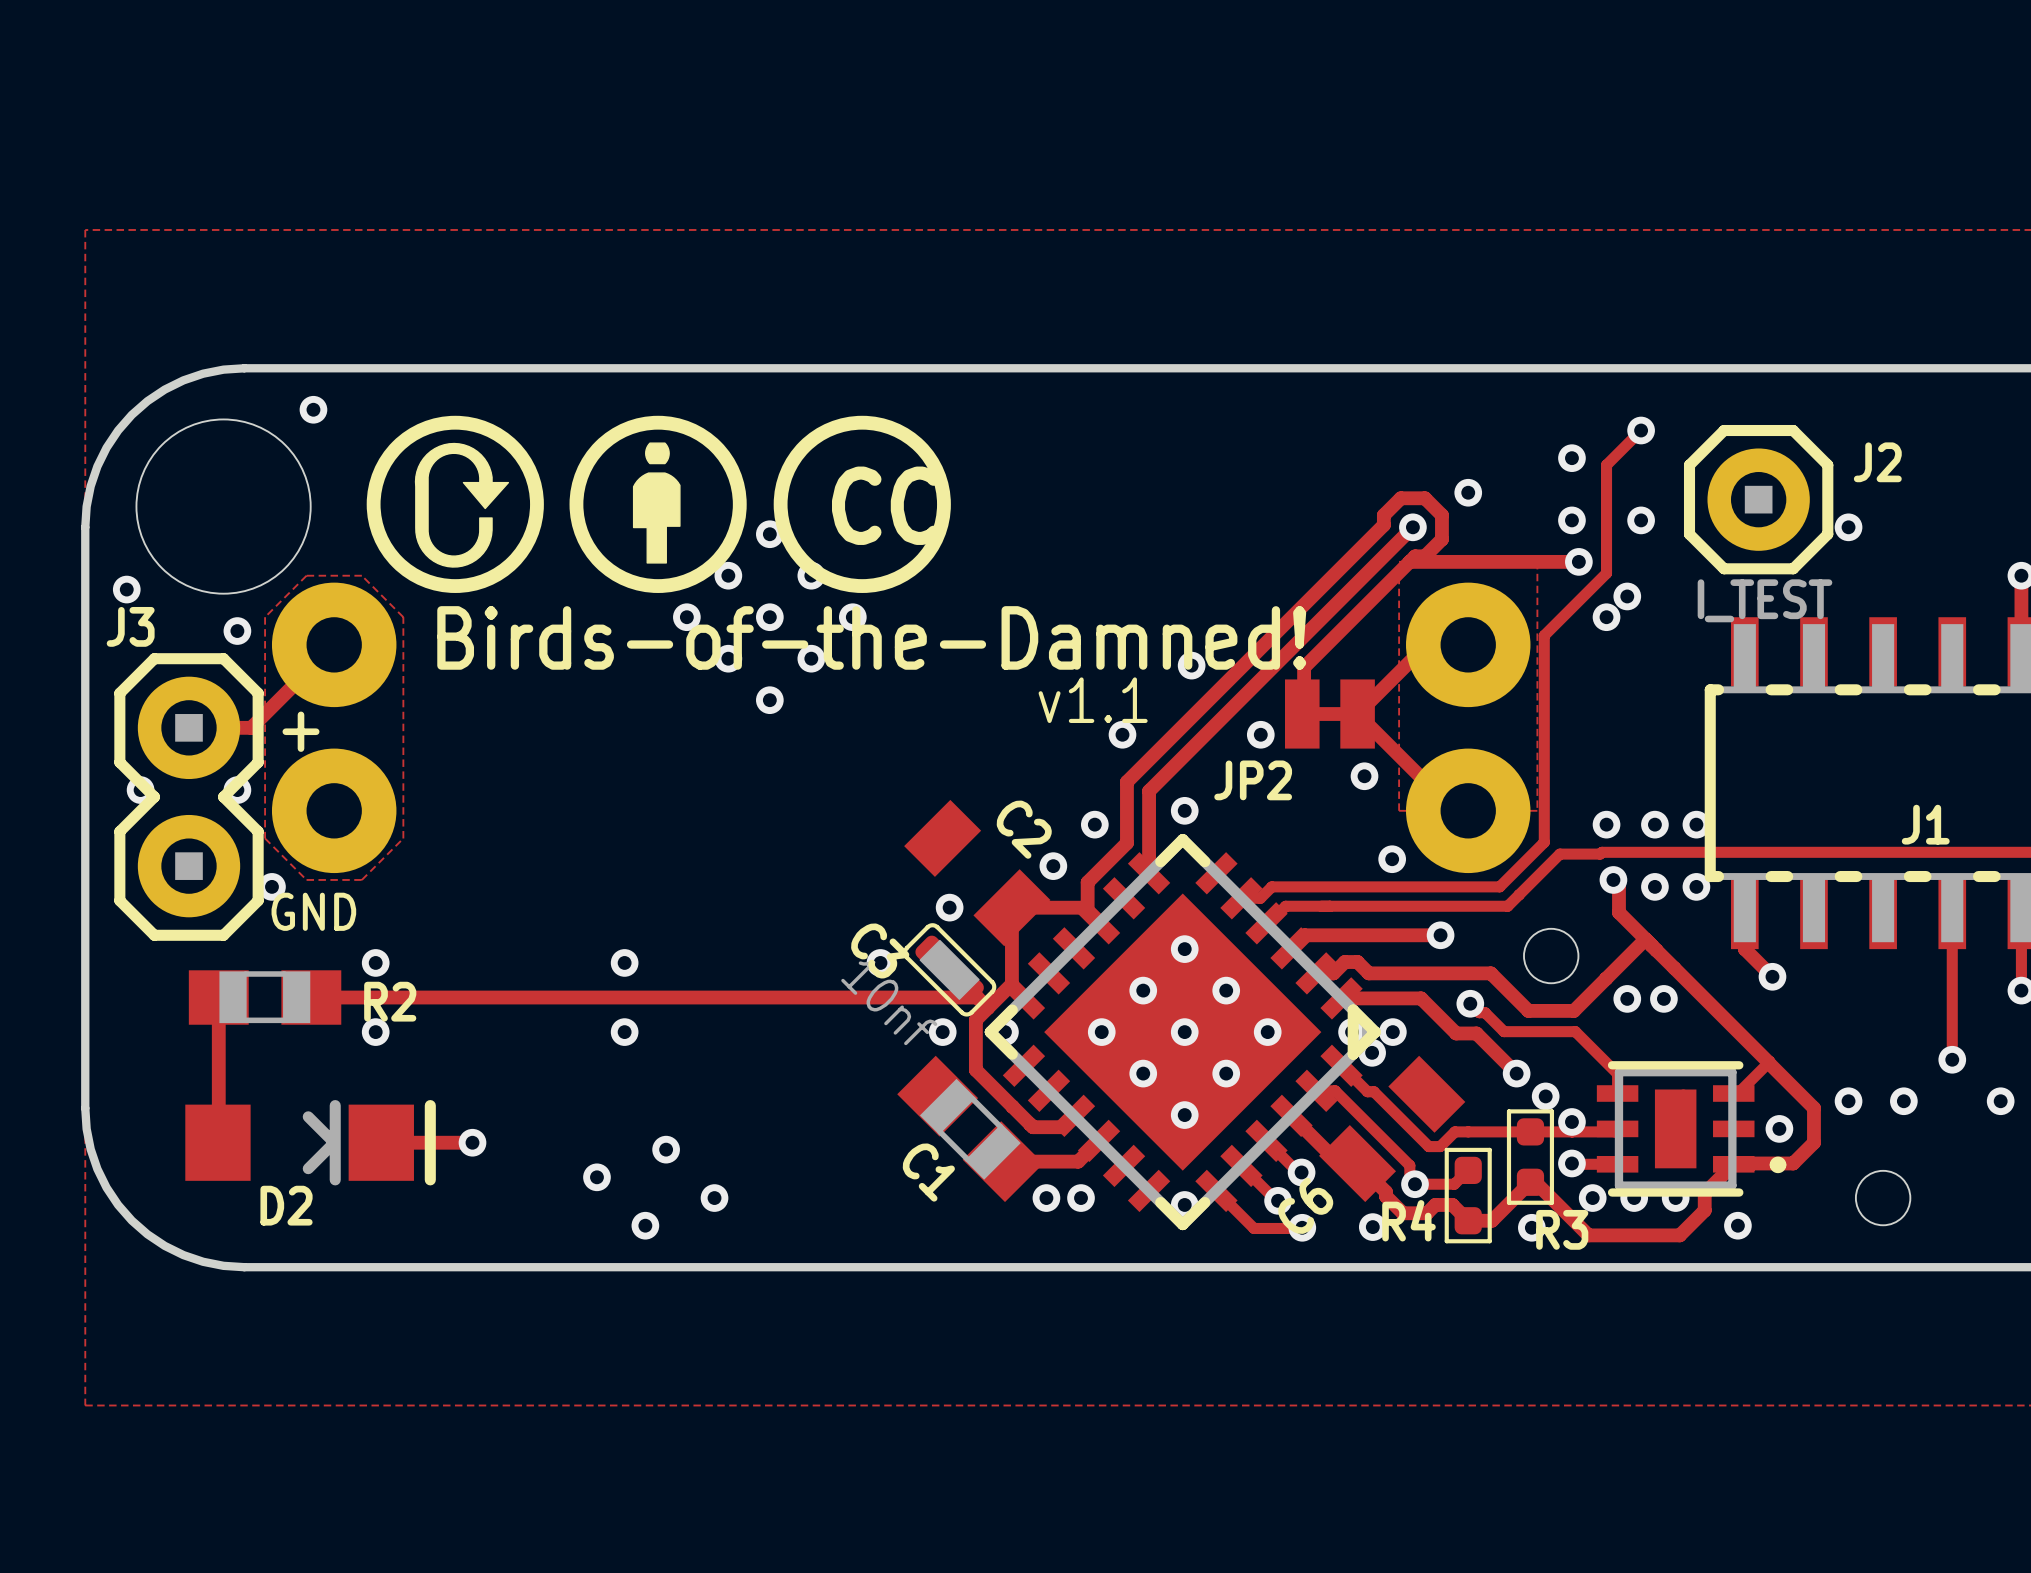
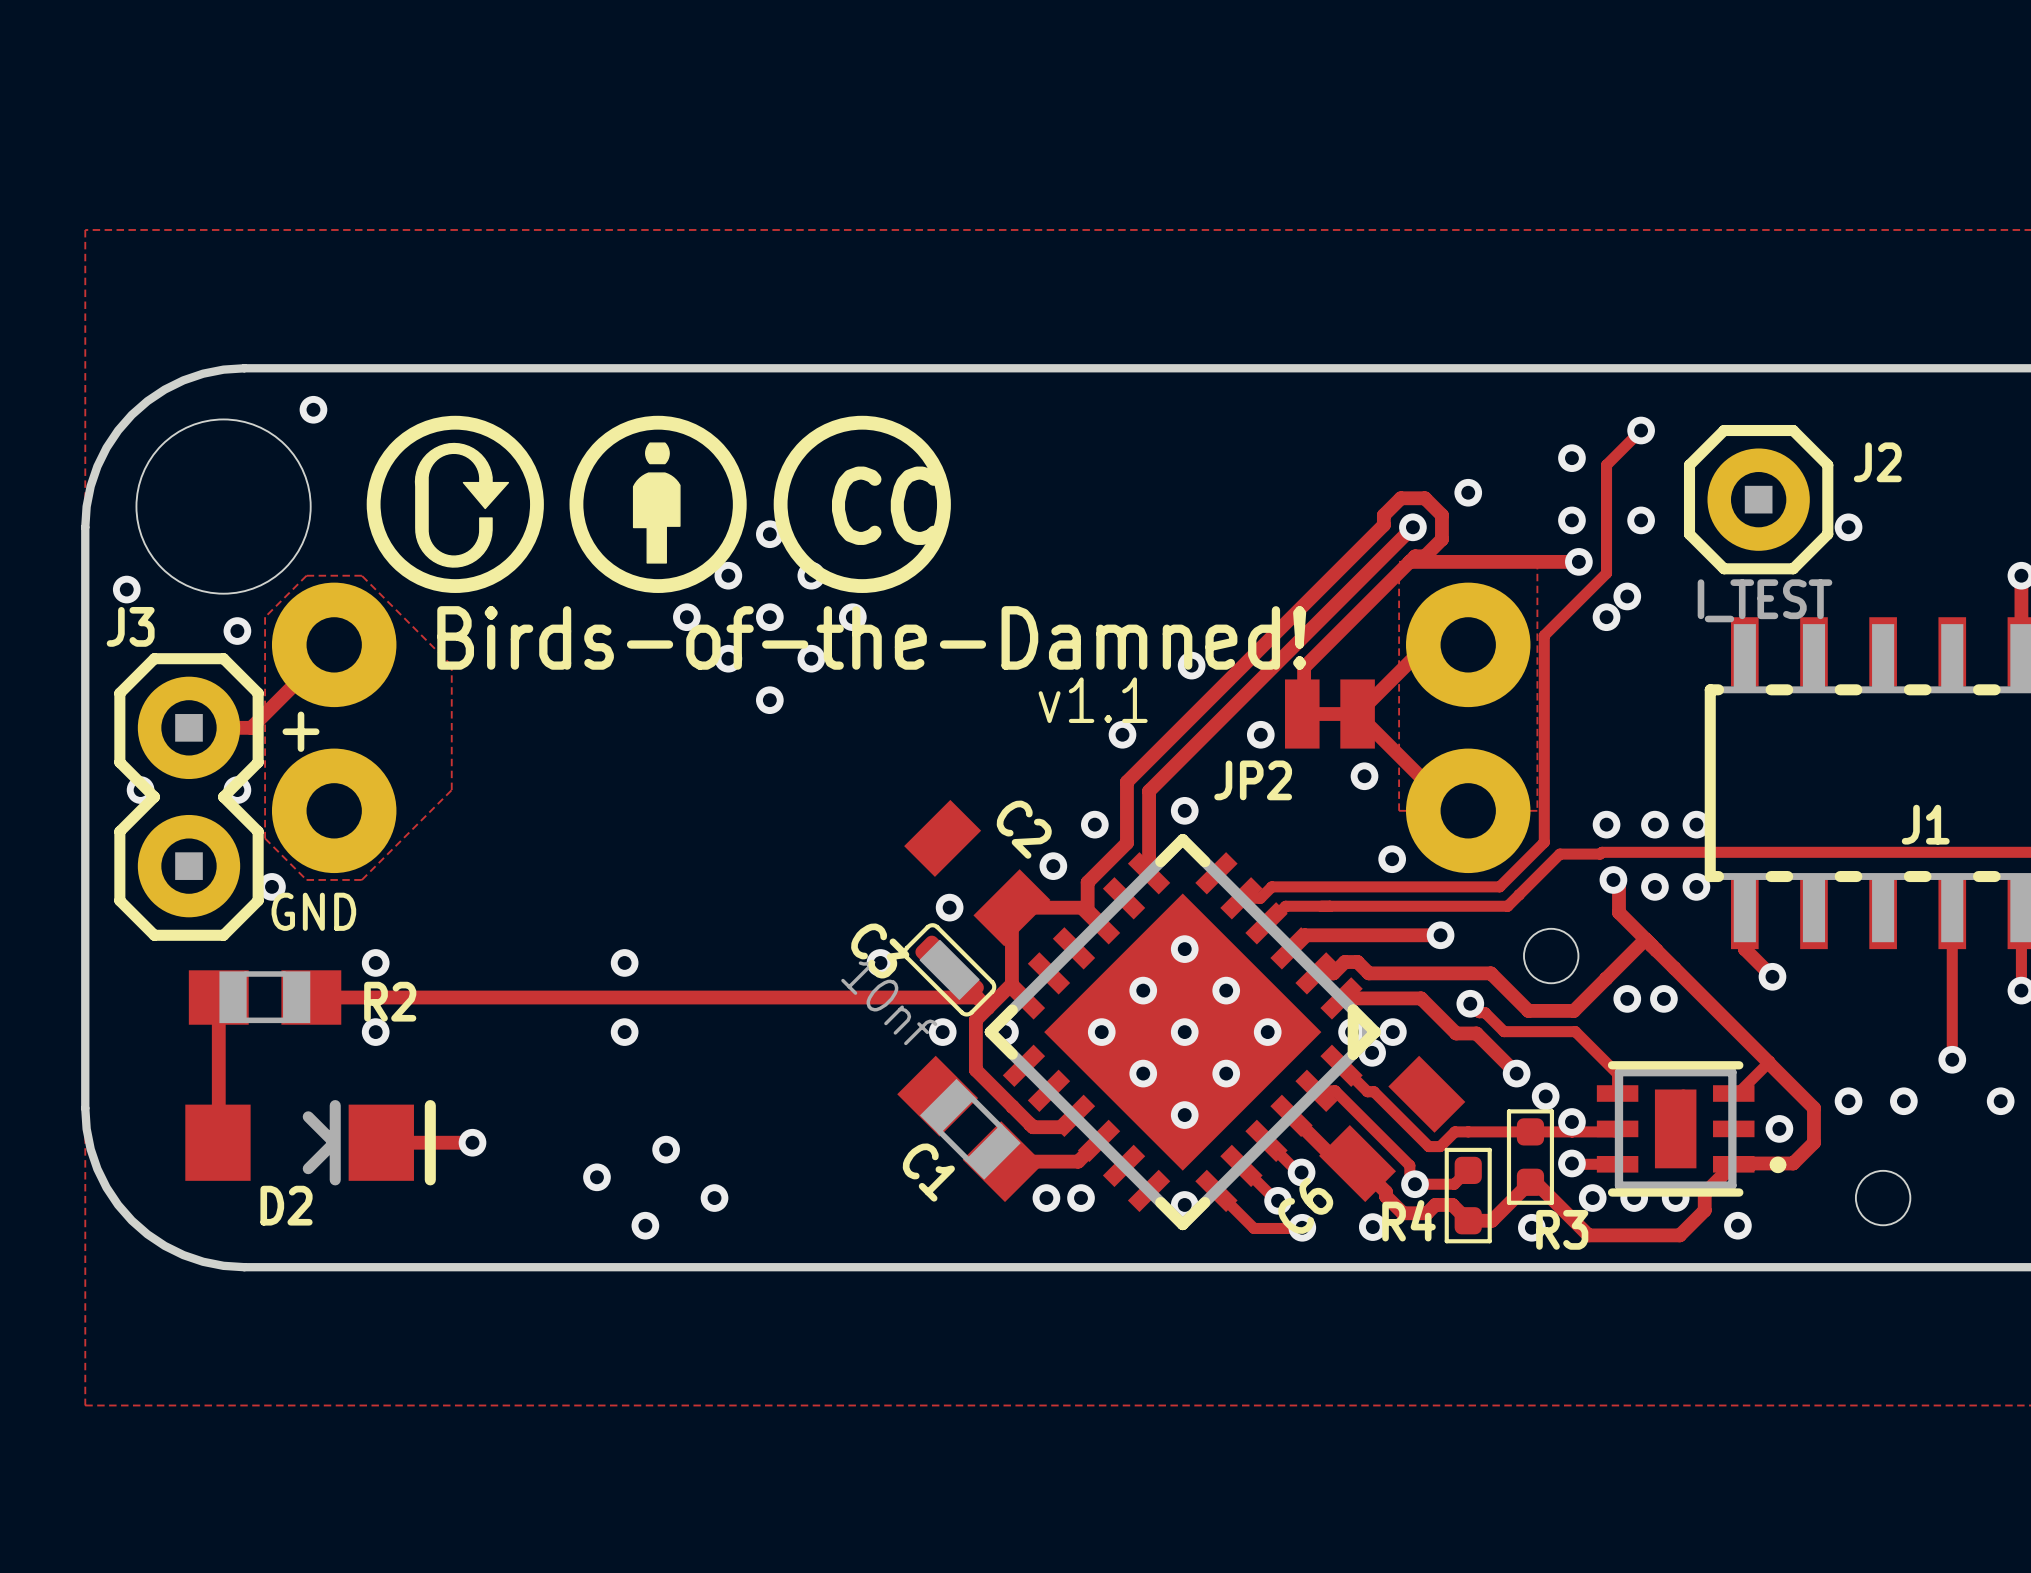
zone outline: (403, 617) (403, 838) -> (403, 617) (451, 665) (451, 790) (403, 838)

